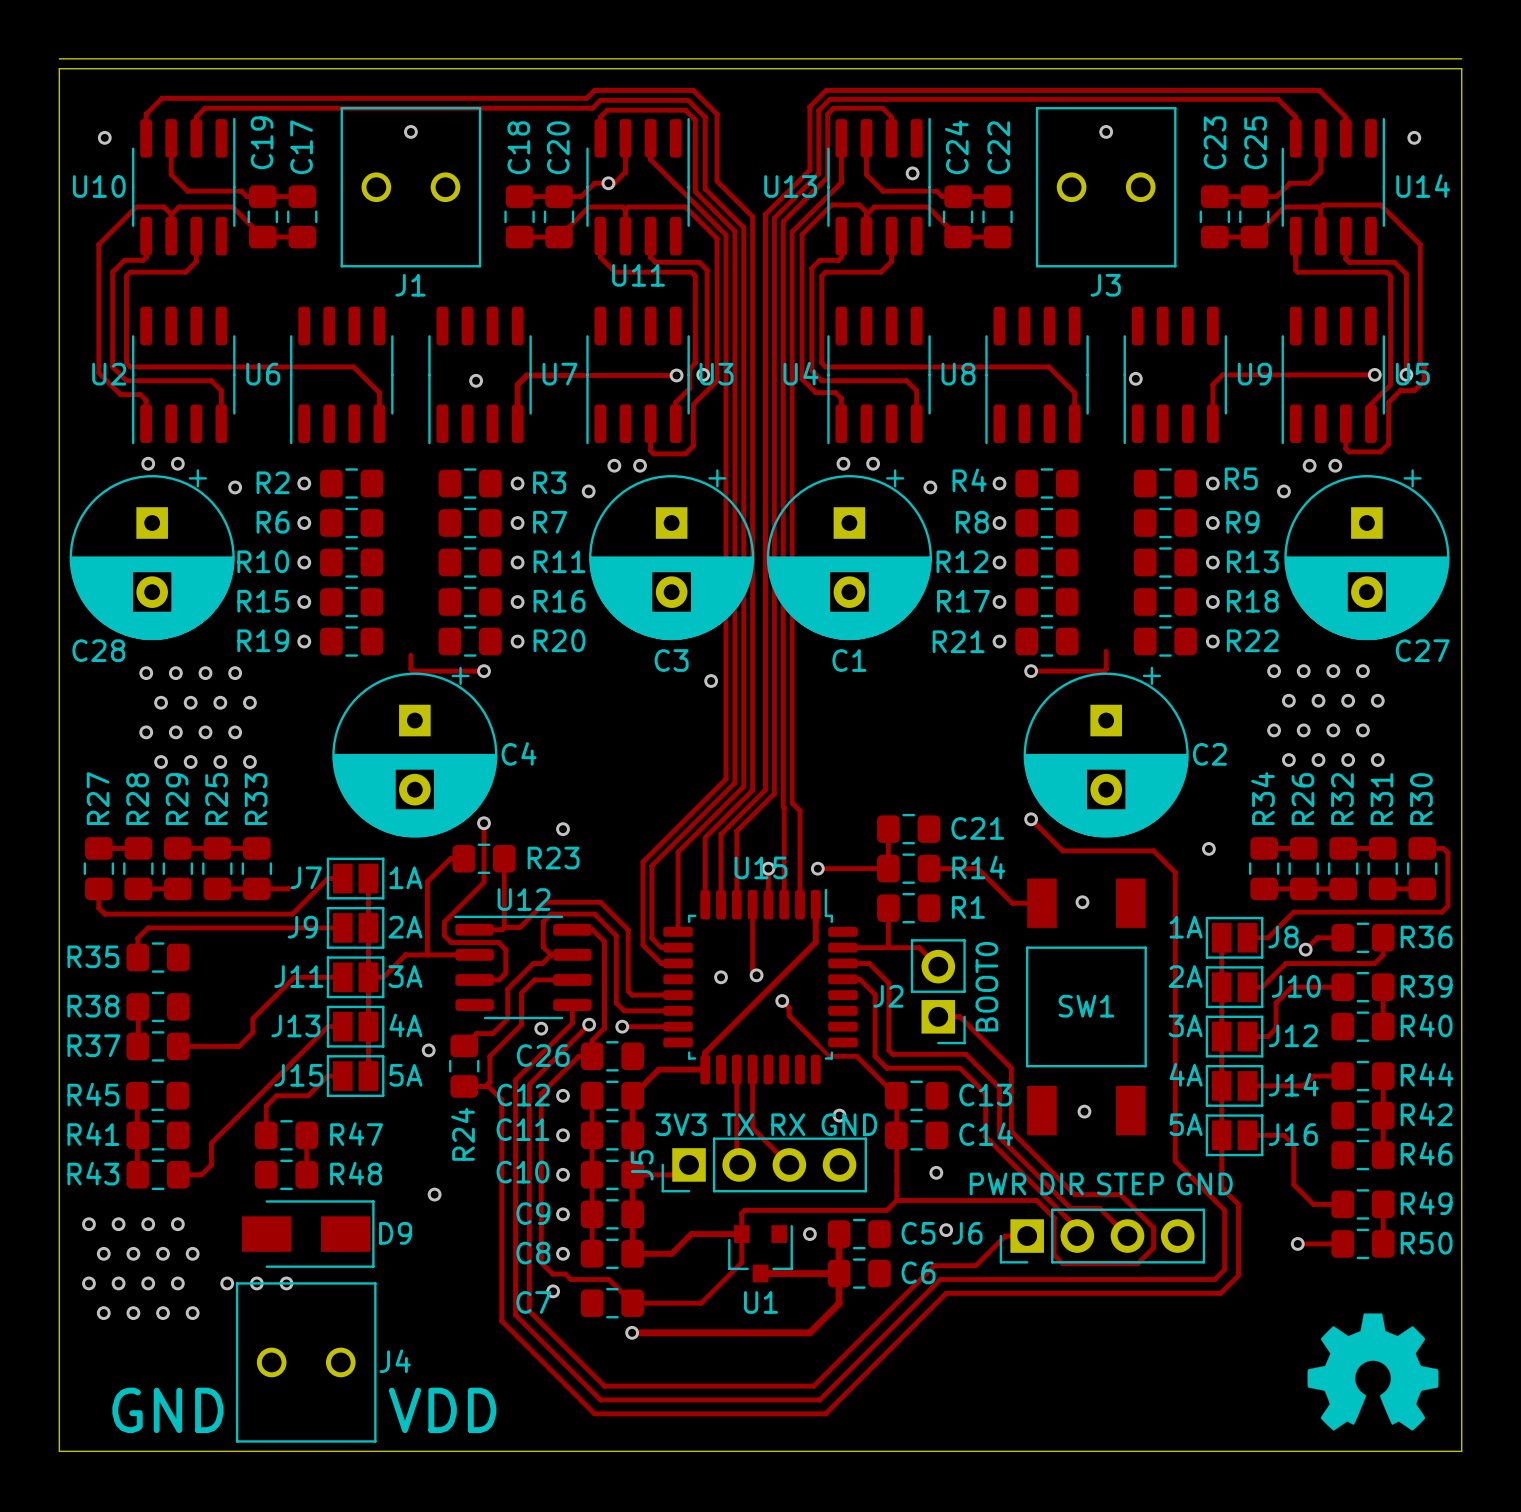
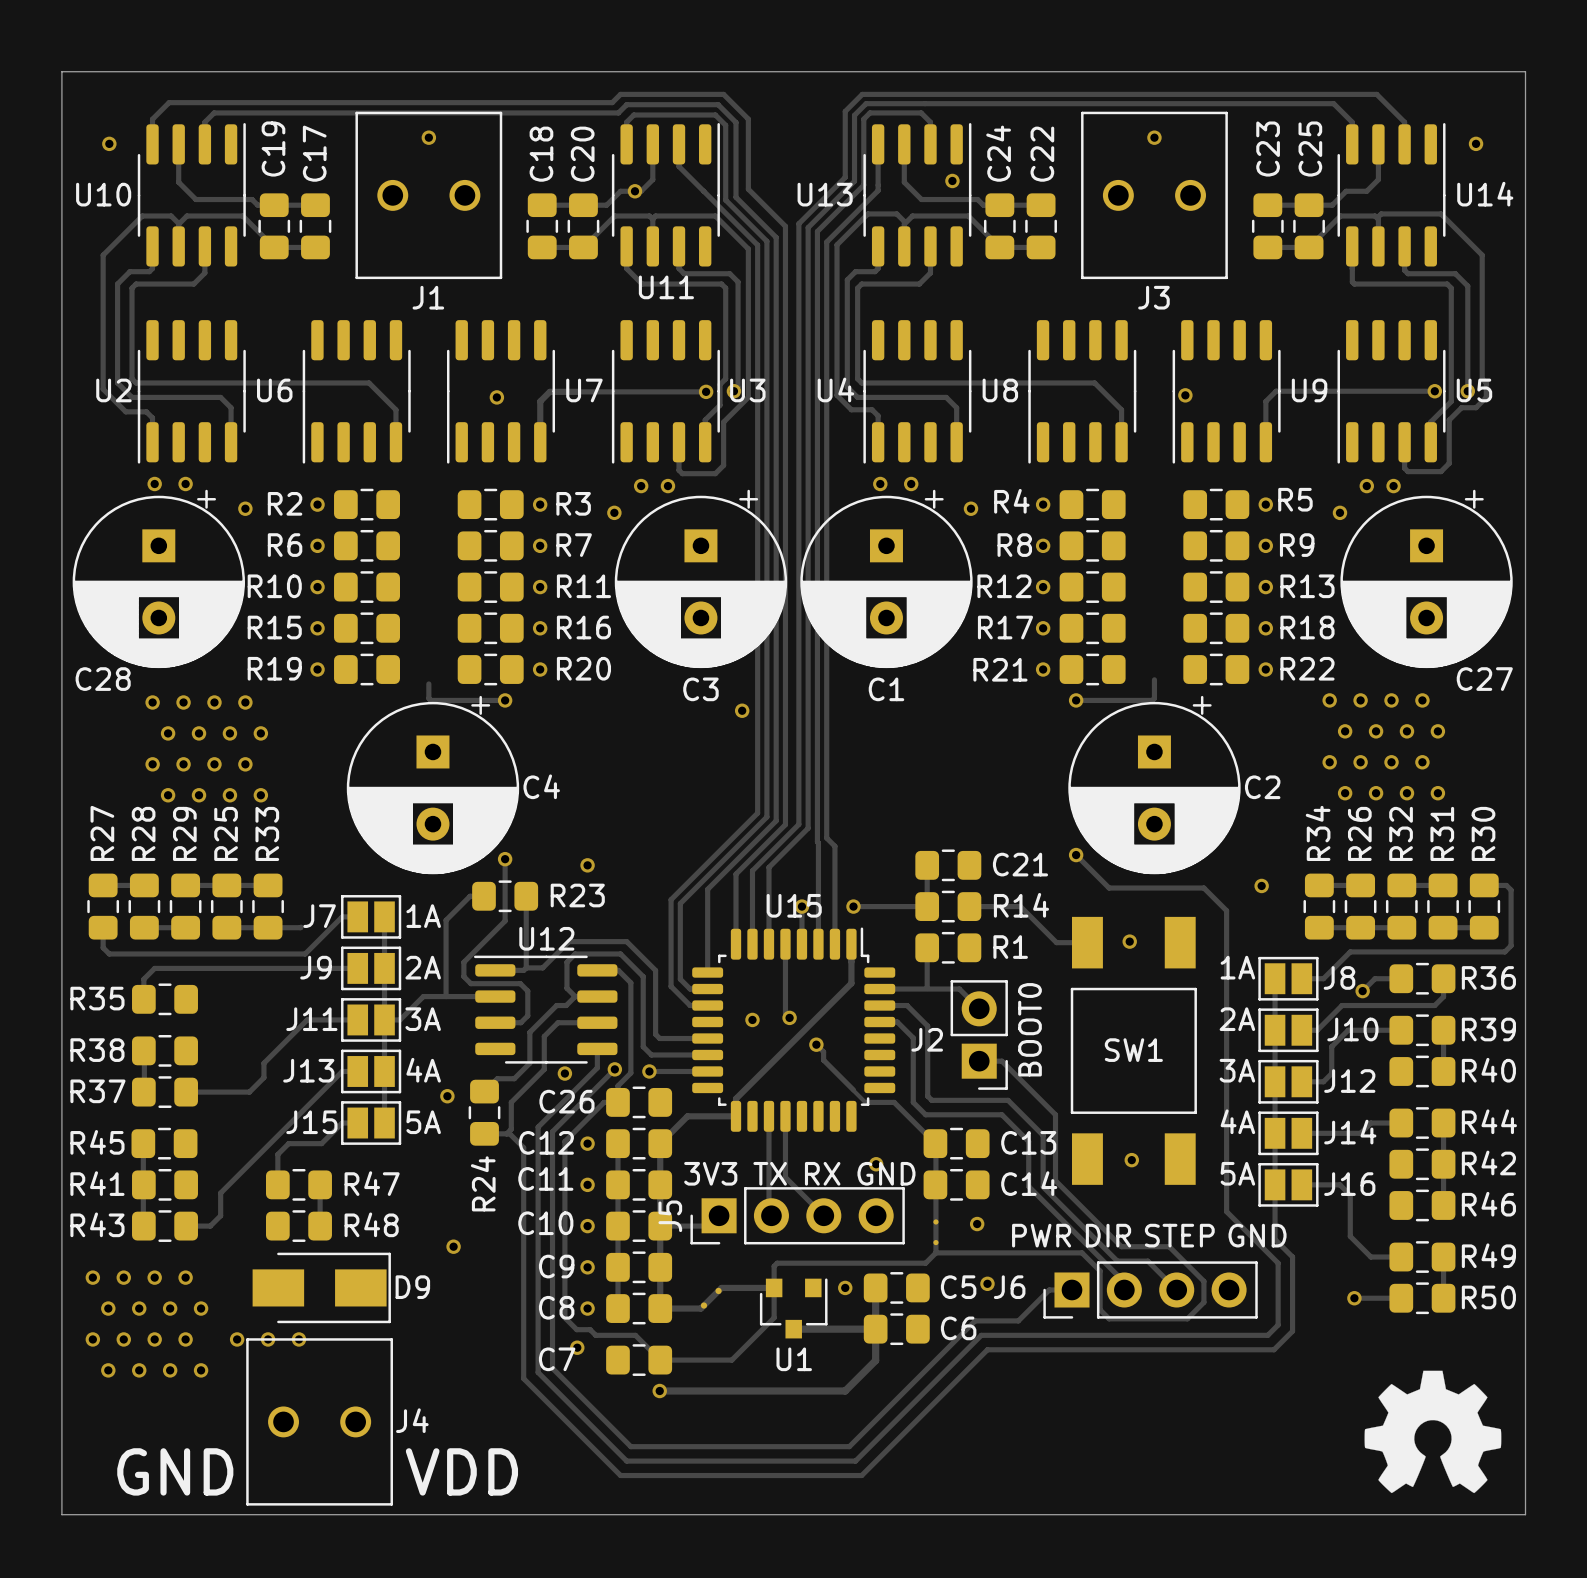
board edge: (59, 58) (1461, 58) -> none

